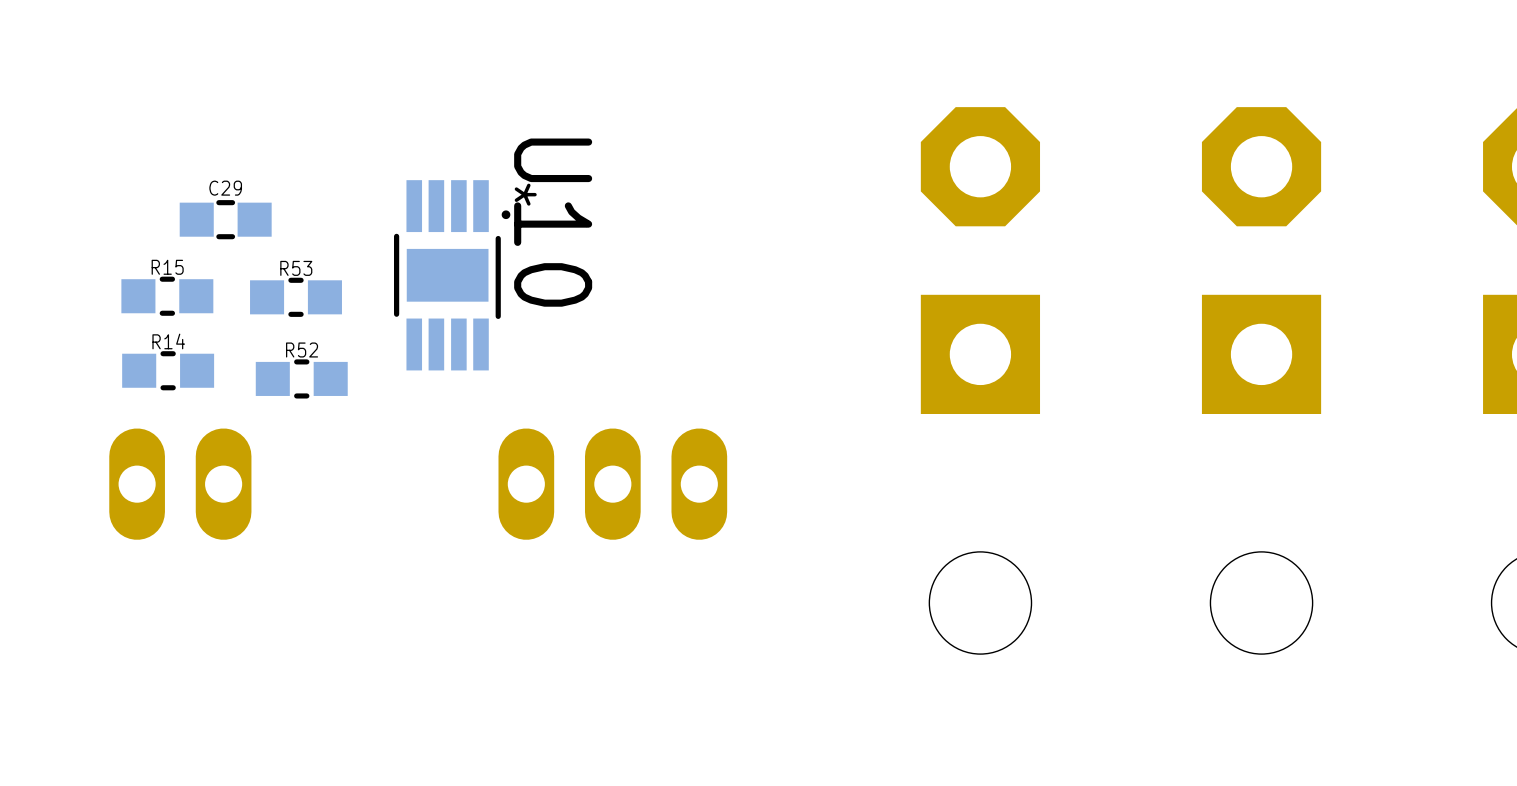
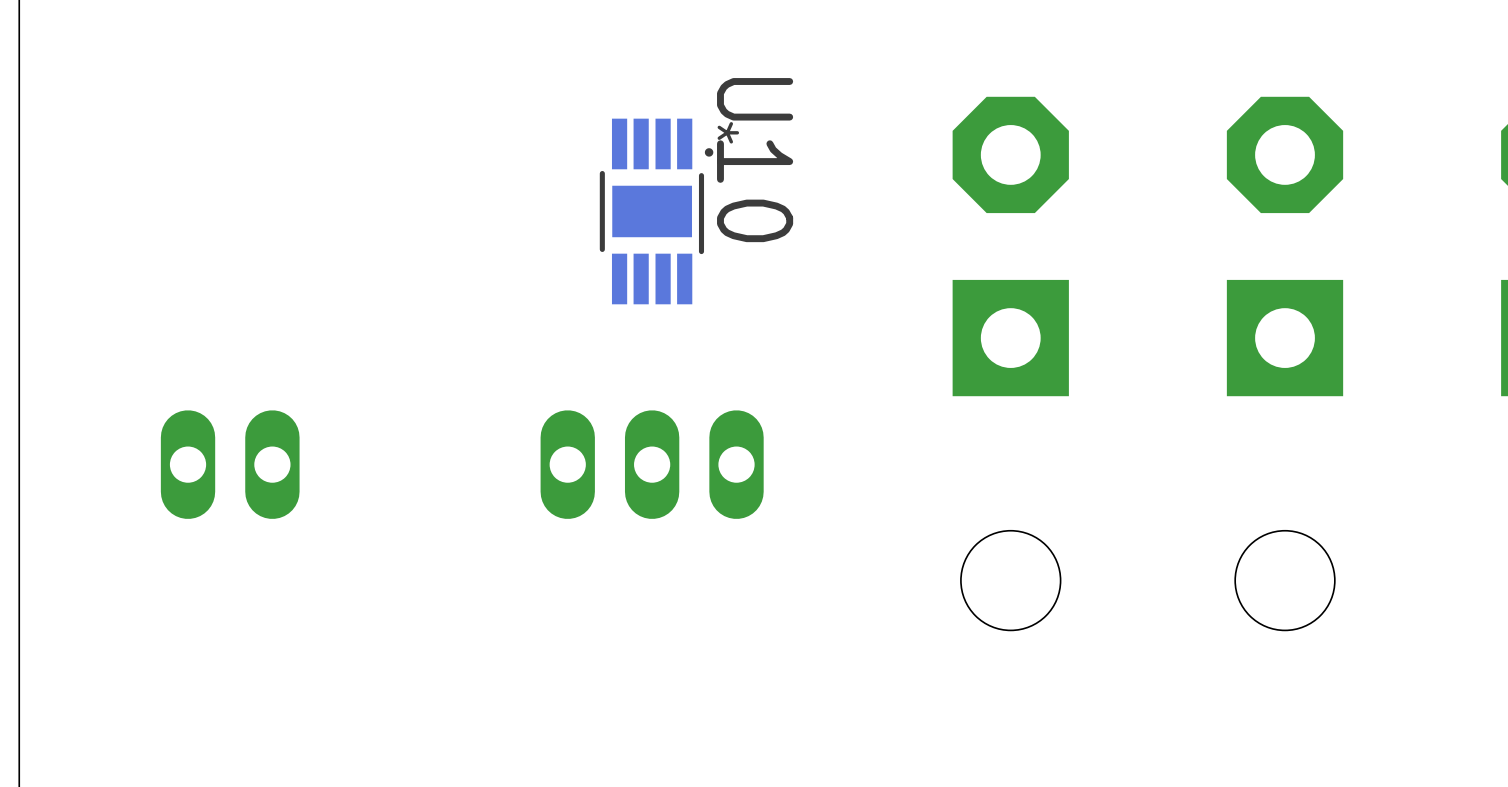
C29: (225, 219) -> none
U10 position: (452, 275) -> (656, 211)
R15: (167, 296) -> none
R53: (296, 297) -> none
R14: (168, 370) -> none
R52: (301, 378) -> none

